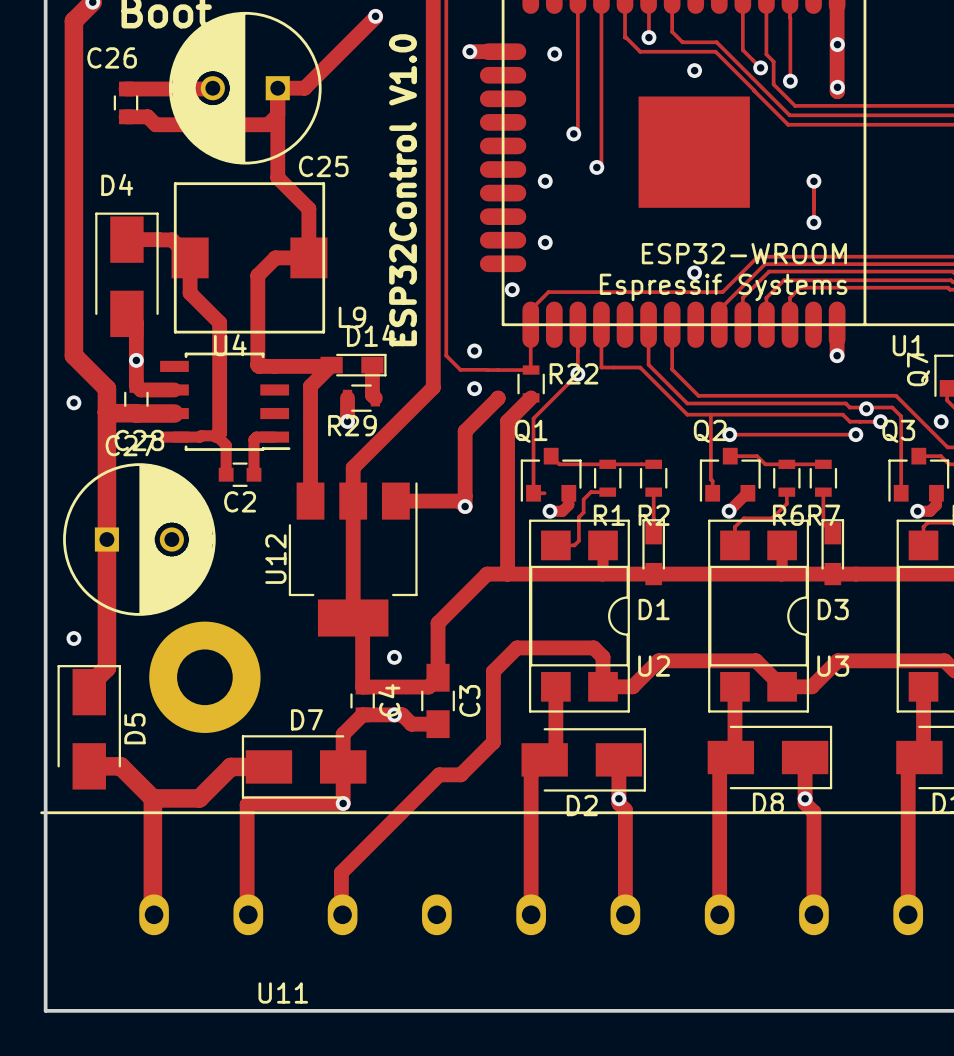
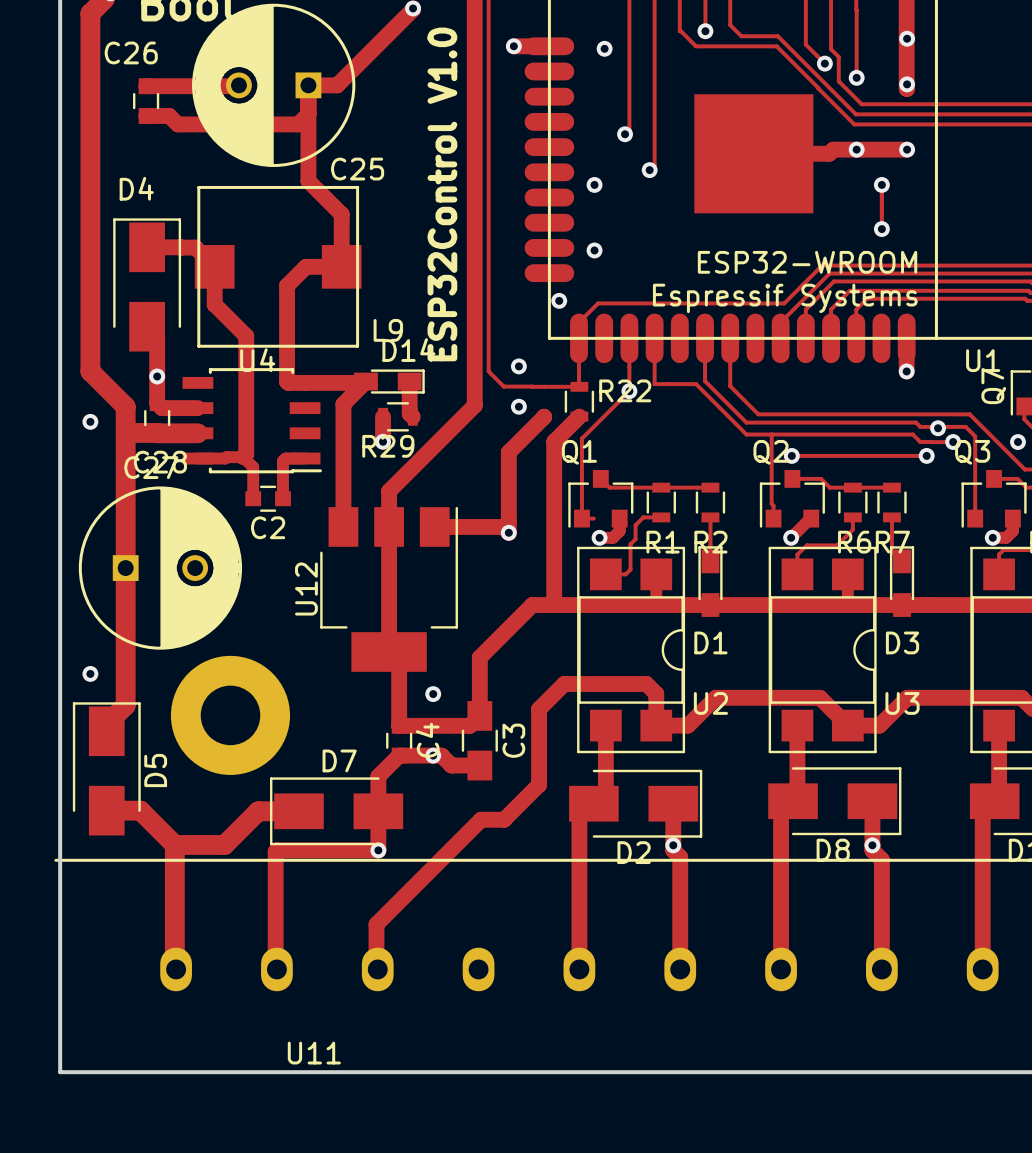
via: (694, 70) -> none
via: none -> (856, 149)
track: none -> (907, 149) (833, 149) (829, 153) (753, 153)
via: none -> (907, 149)
via: (694, 272) -> none

